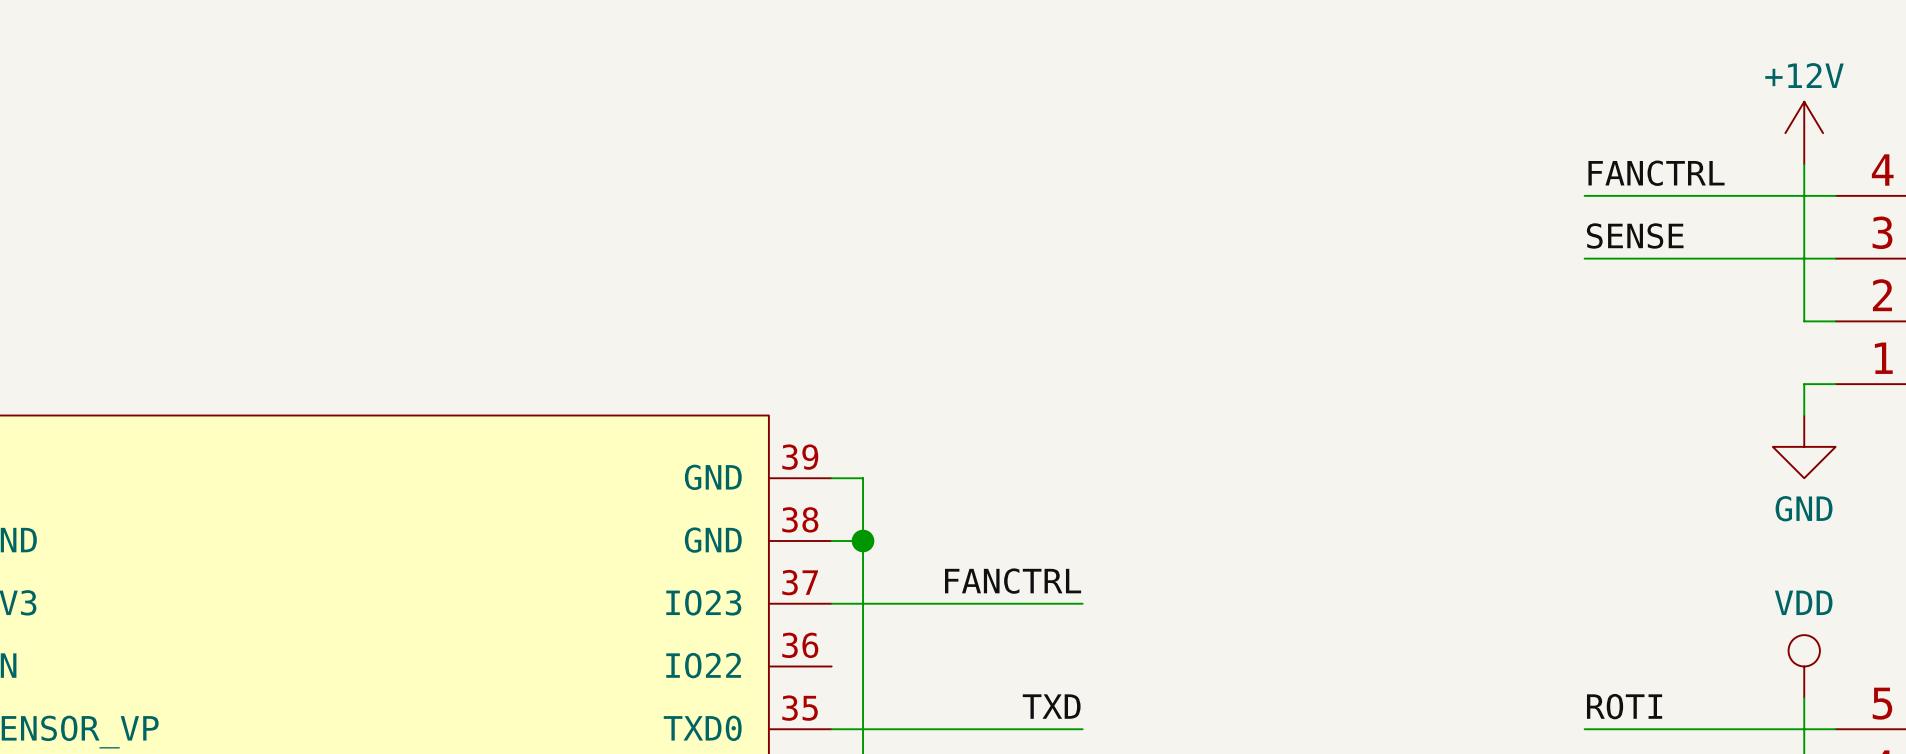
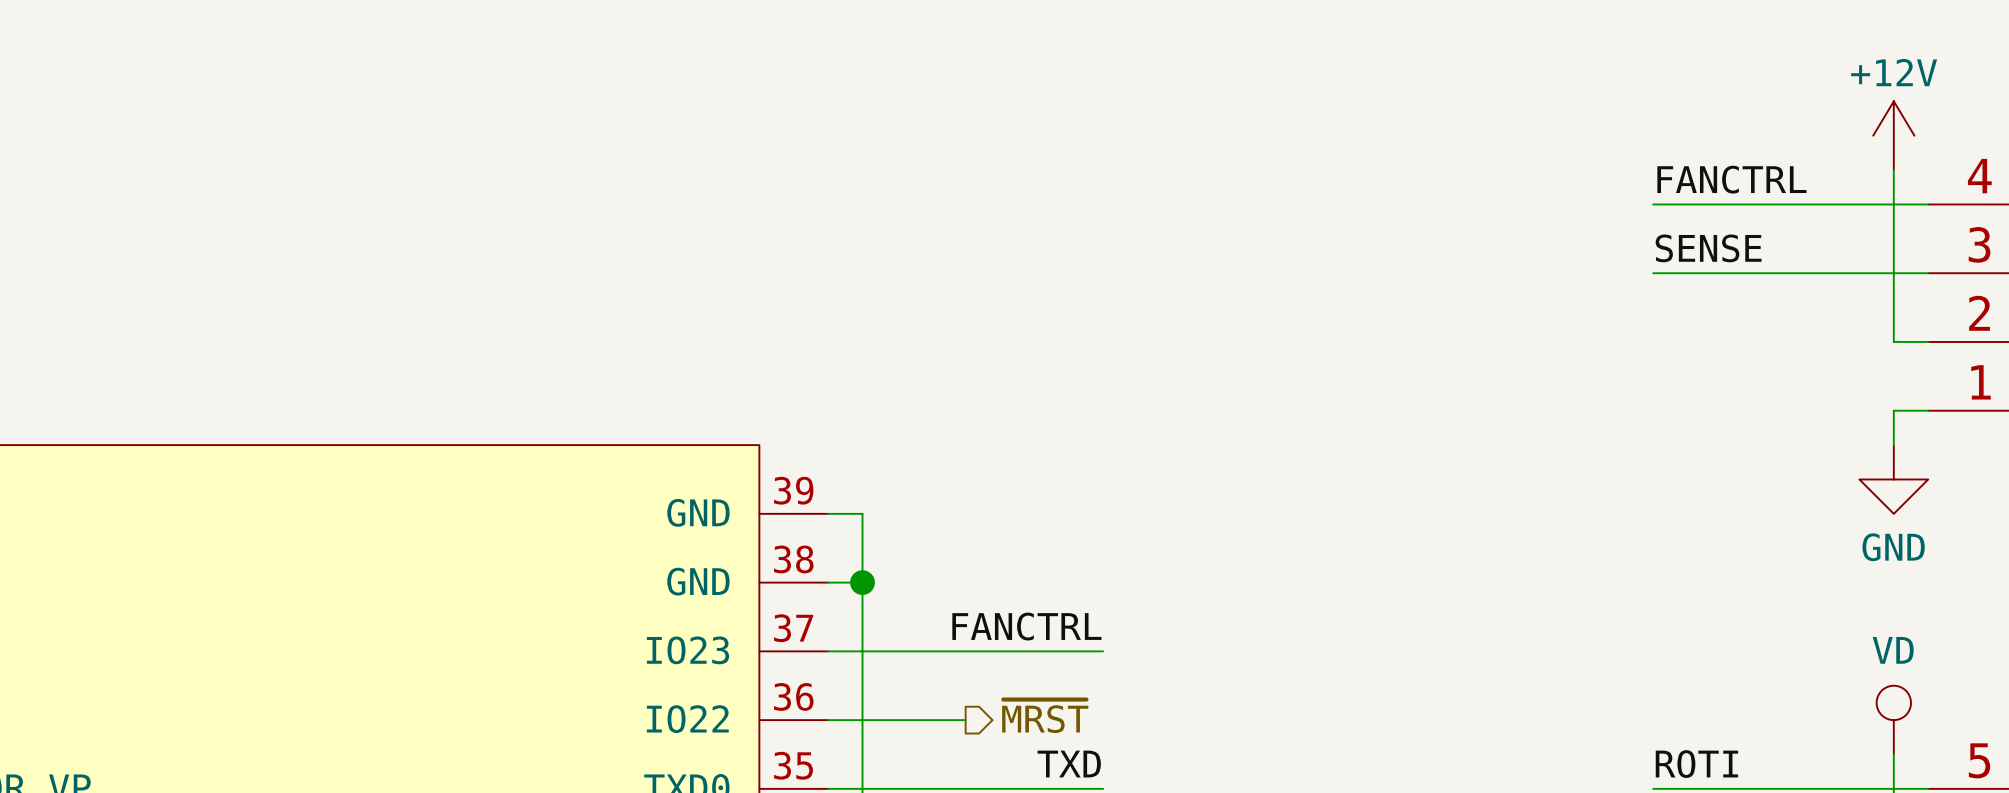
hierarchical label: none -> ~{MRST} (1045, 716)
wire: none -> (828, 720) (965, 720)
power symbol: VDD (1804, 666) -> VD (1893, 720)

